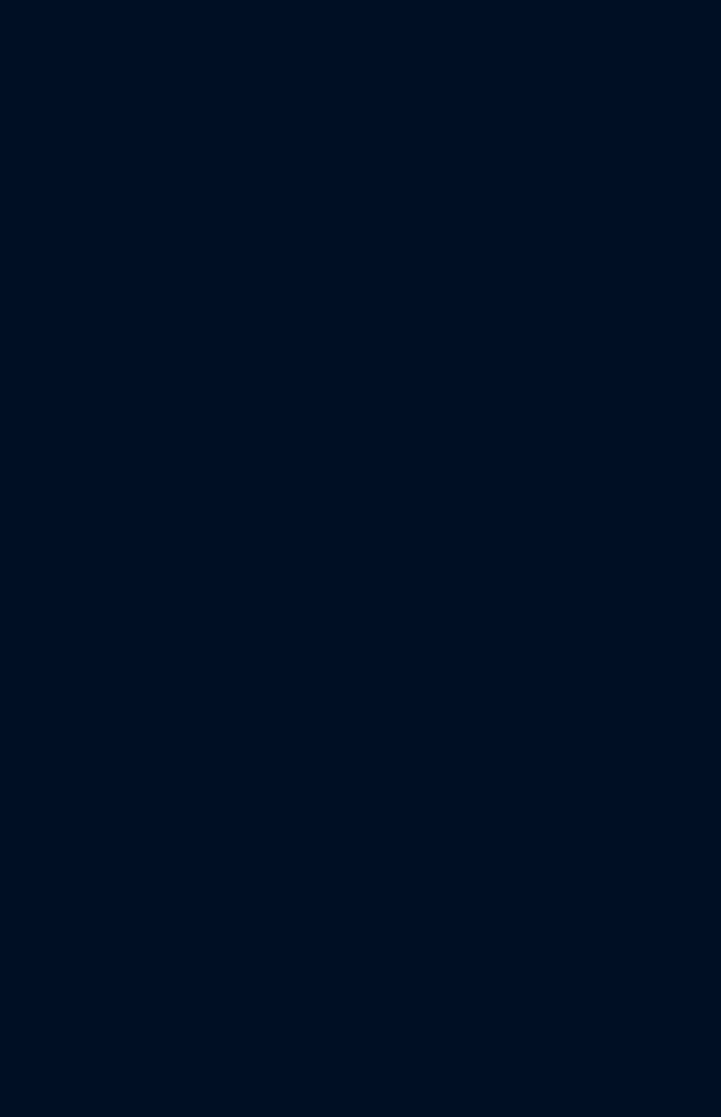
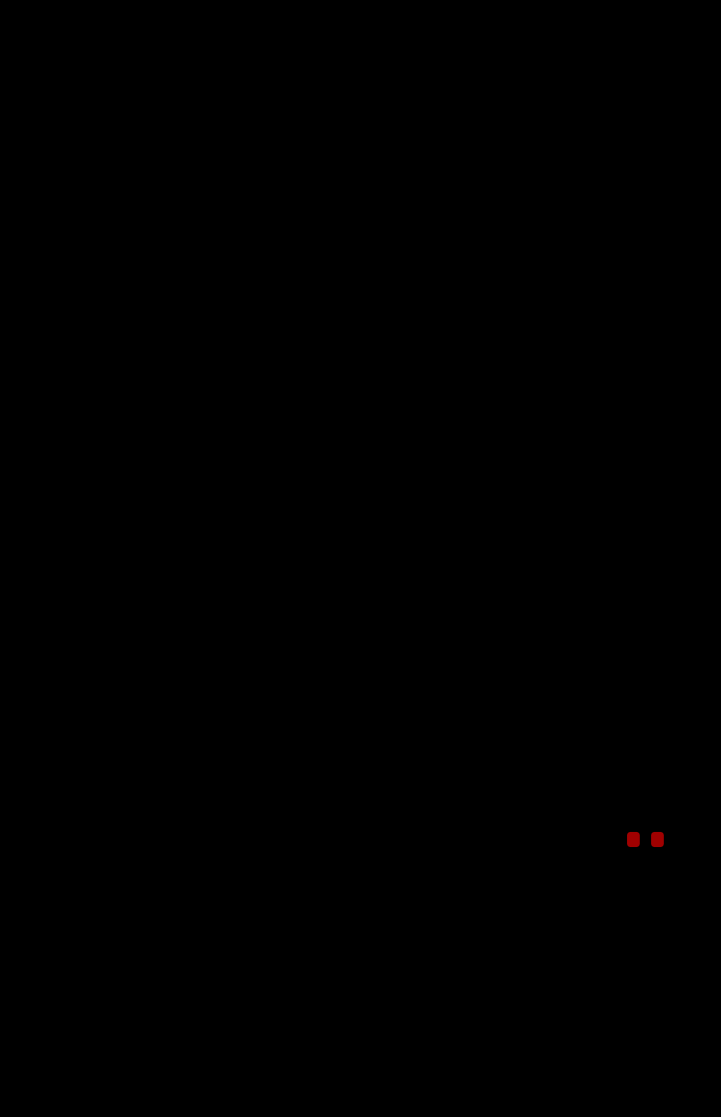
part: none -> (645, 839)

